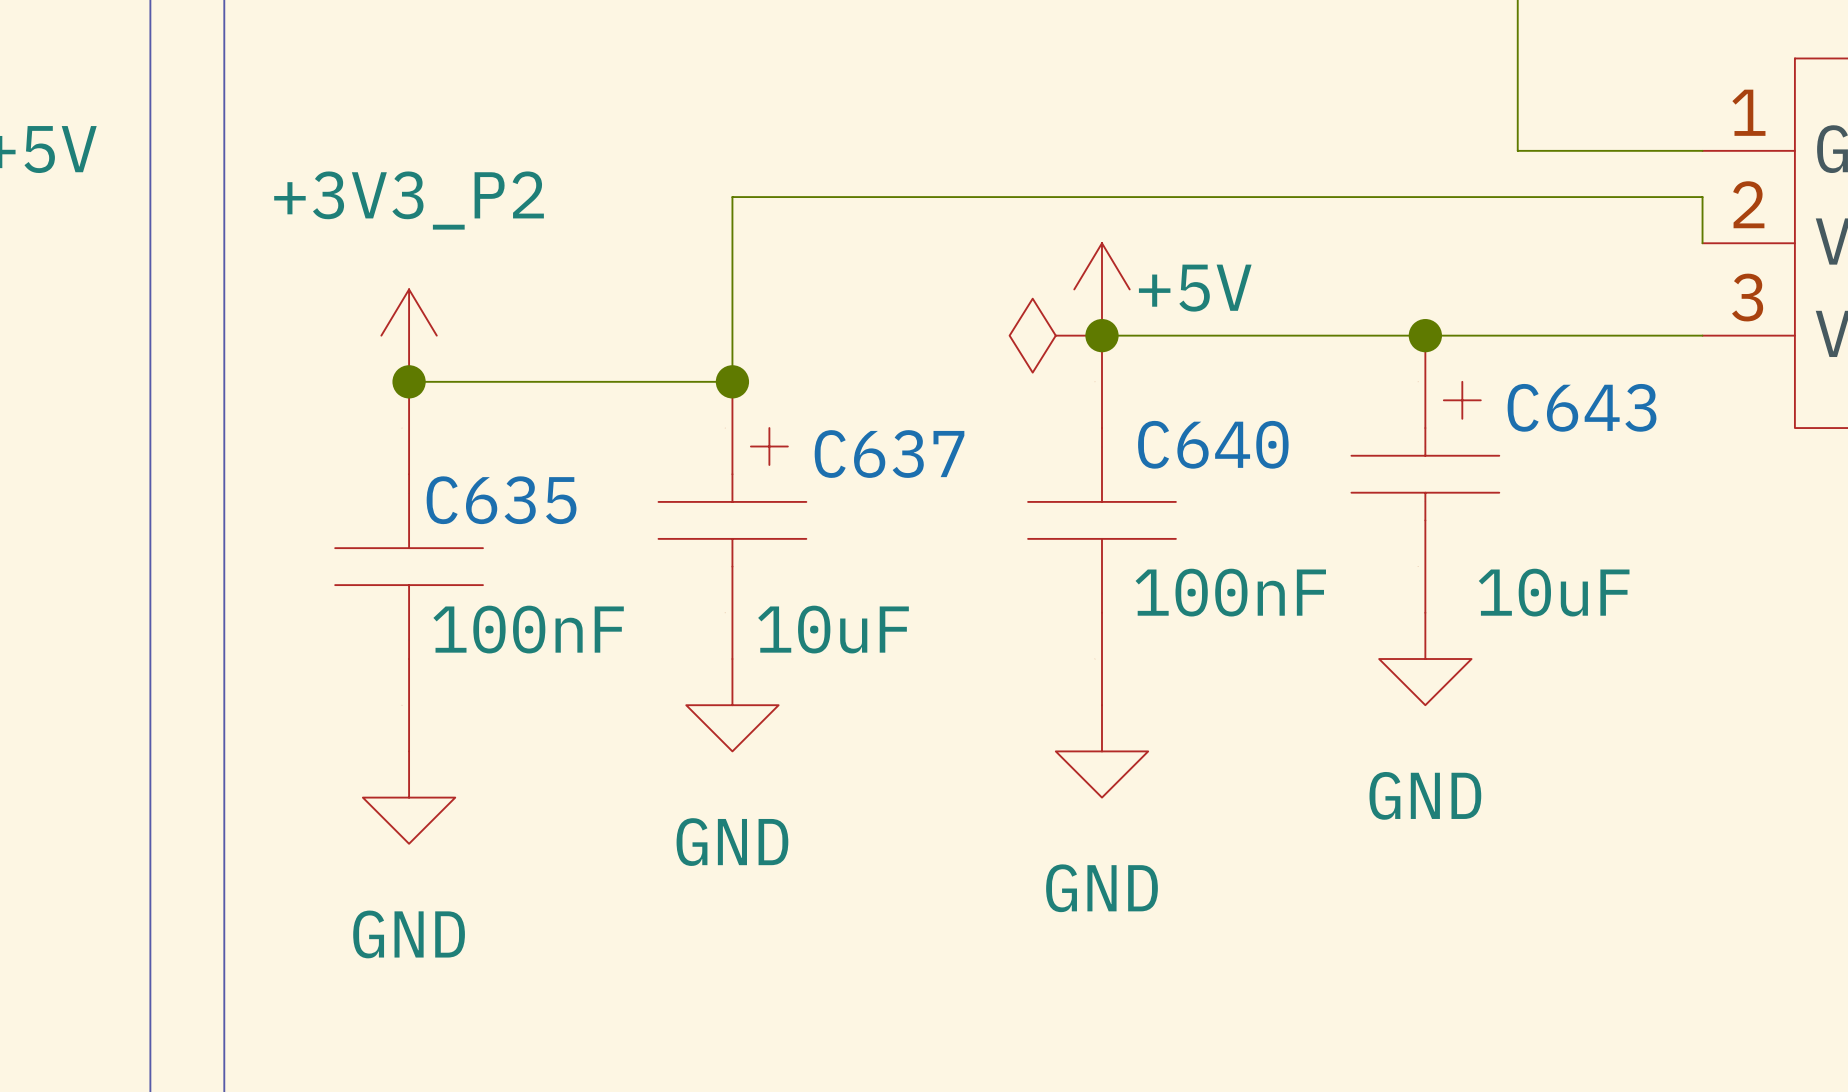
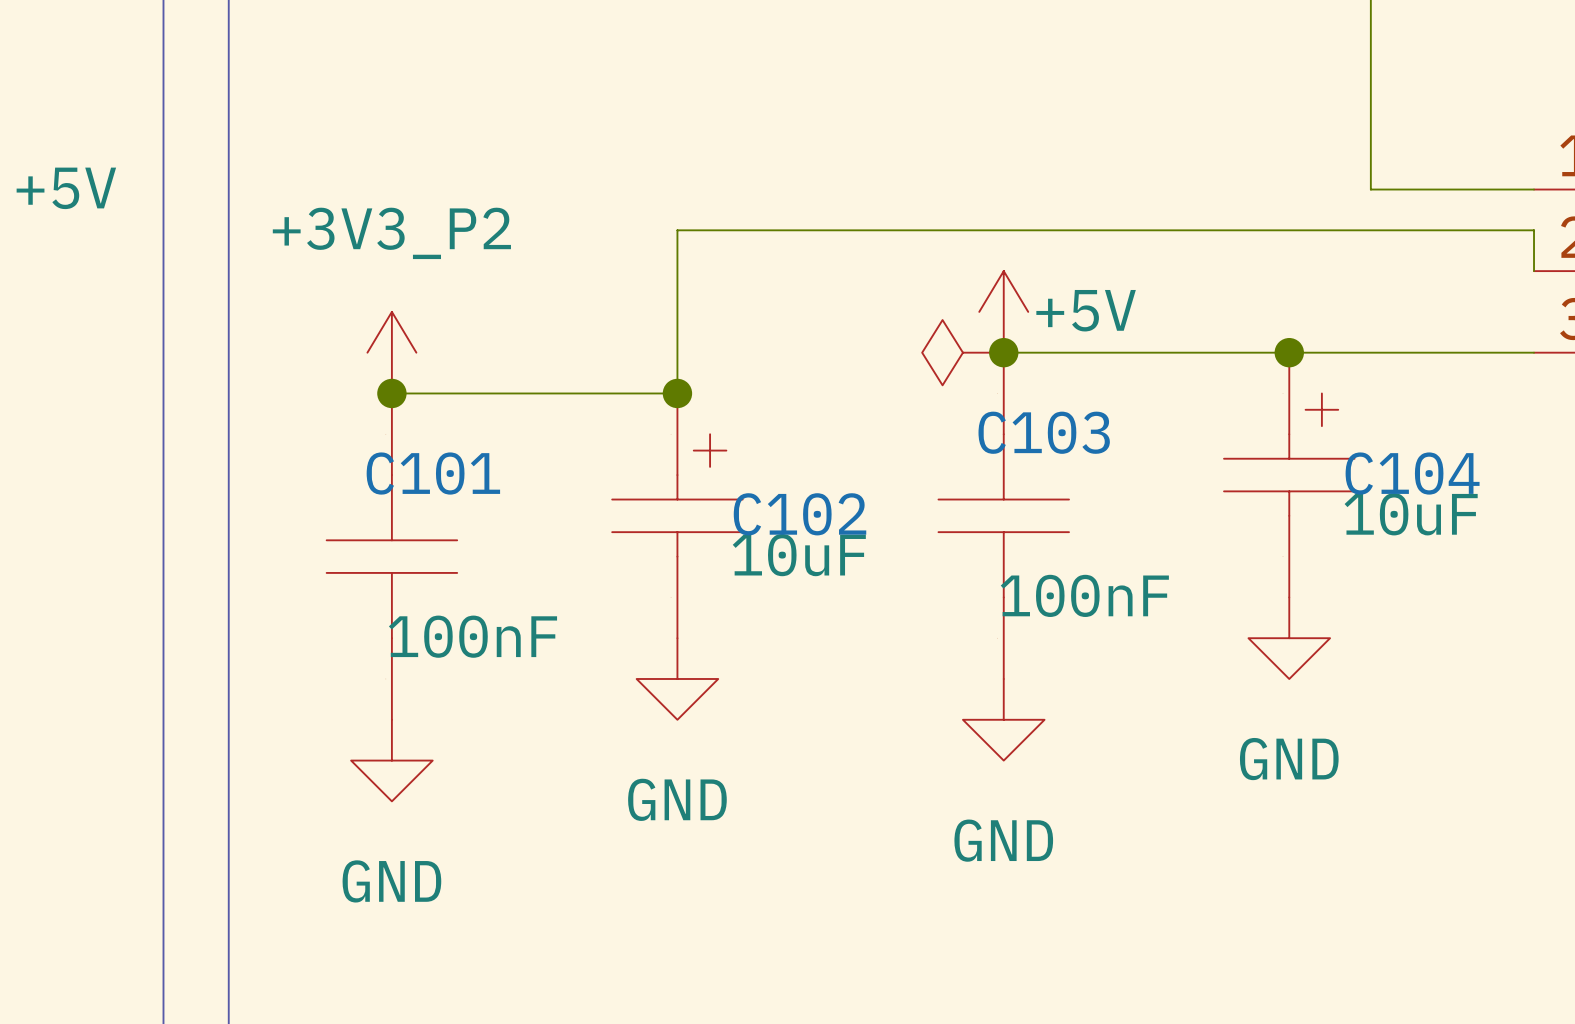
C643 name: C643 (1582, 407) -> C104 (1412, 473)
C640 name: C640 (1213, 444) -> C103 (1044, 432)
C637 name: C637 (889, 454) -> C102 (800, 514)
C635 name: C635 (501, 500) -> C101 (433, 473)
C640 value position: 100nF (1230, 592) -> 100nF (1084, 595)
C643 value position: 10uF (1554, 592) -> 10uF (1411, 514)
C635 value position: 100nF (528, 629) -> 100nF (472, 636)
C637 value position: 10uF (833, 629) -> 10uF (799, 555)

